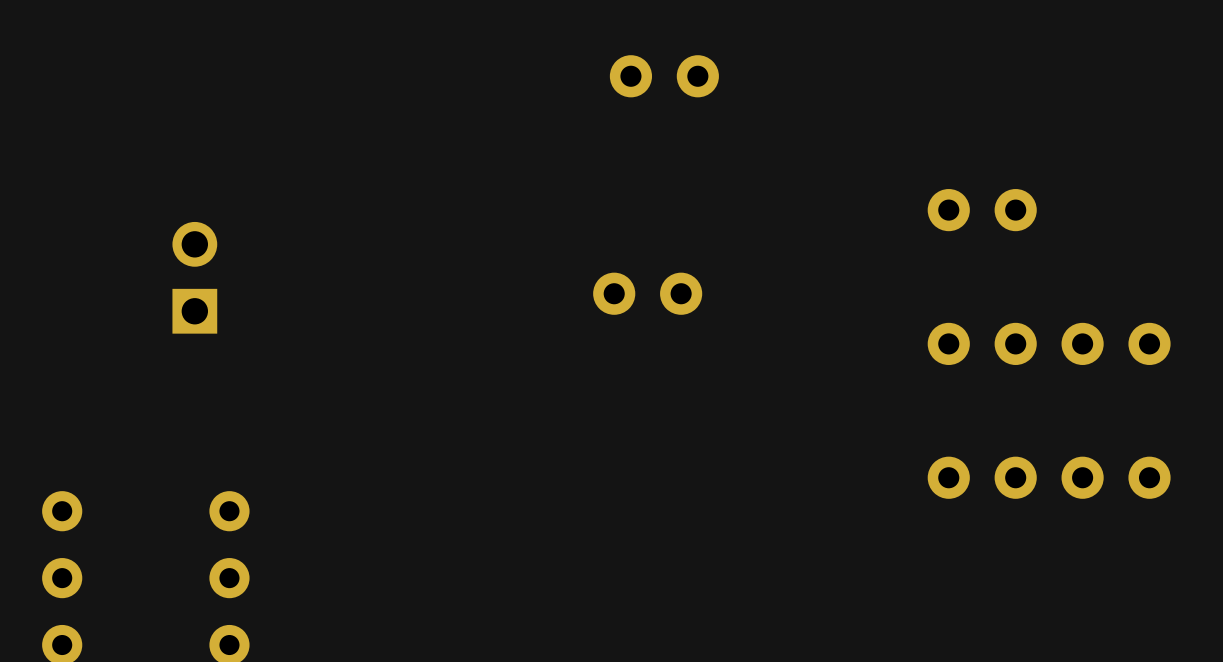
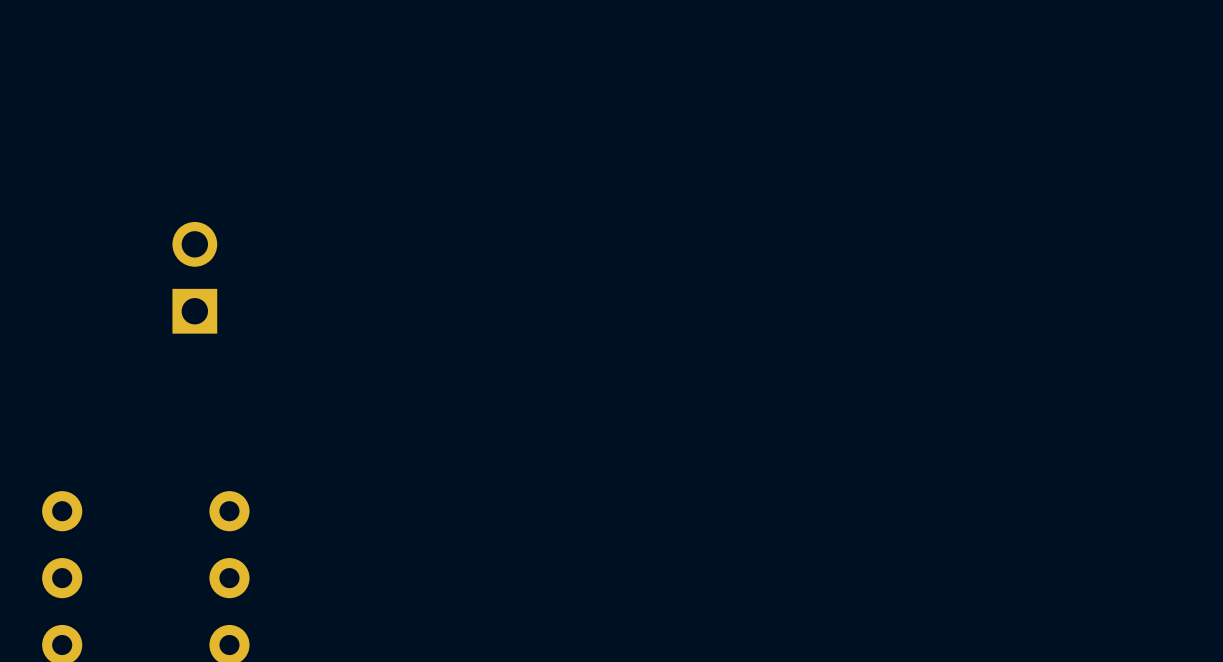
part: (664, 76) -> none
part: (982, 210) -> none
part: (647, 293) -> none
part: (982, 343) -> none
part: (1116, 343) -> none
part: (982, 477) -> none
part: (1116, 477) -> none

